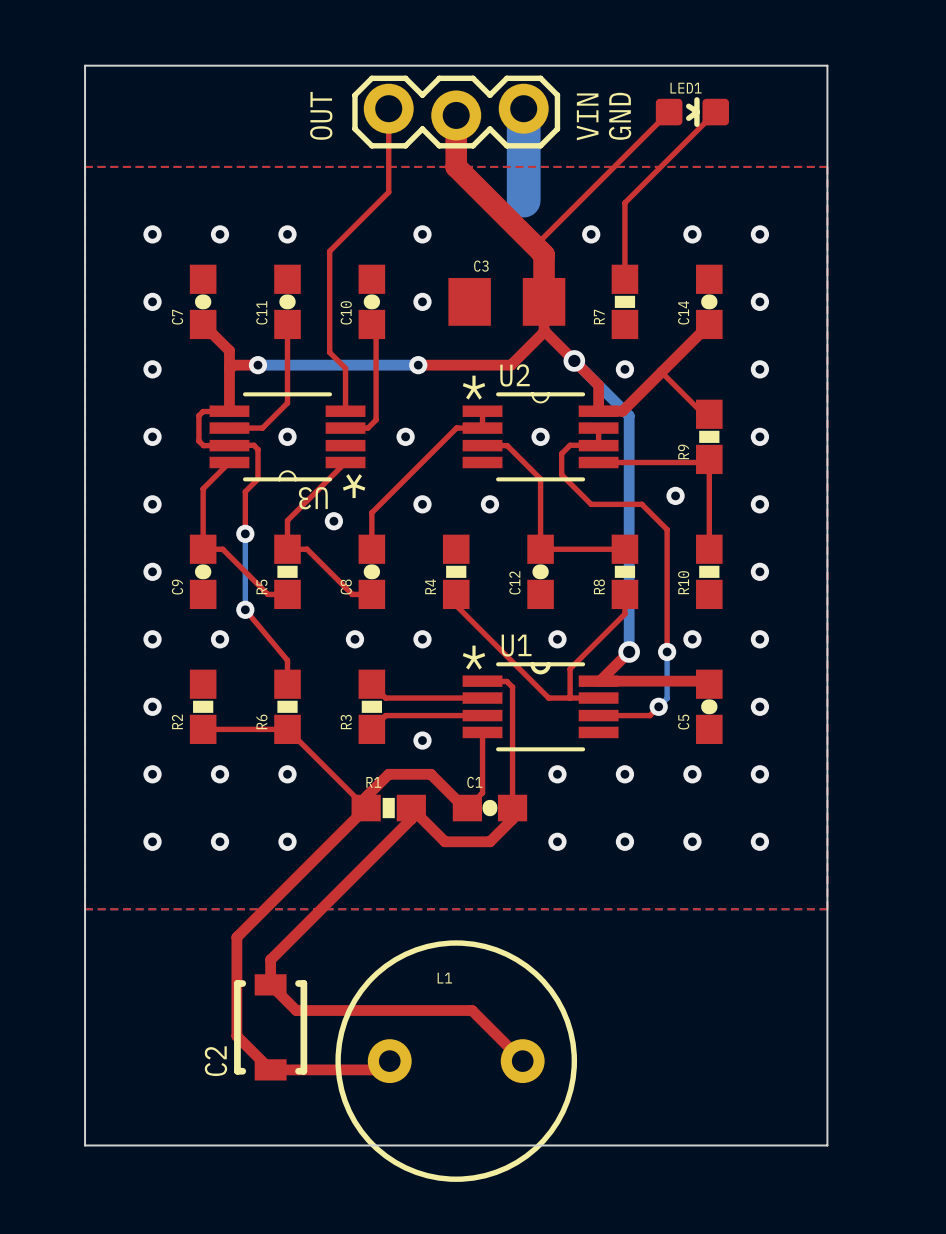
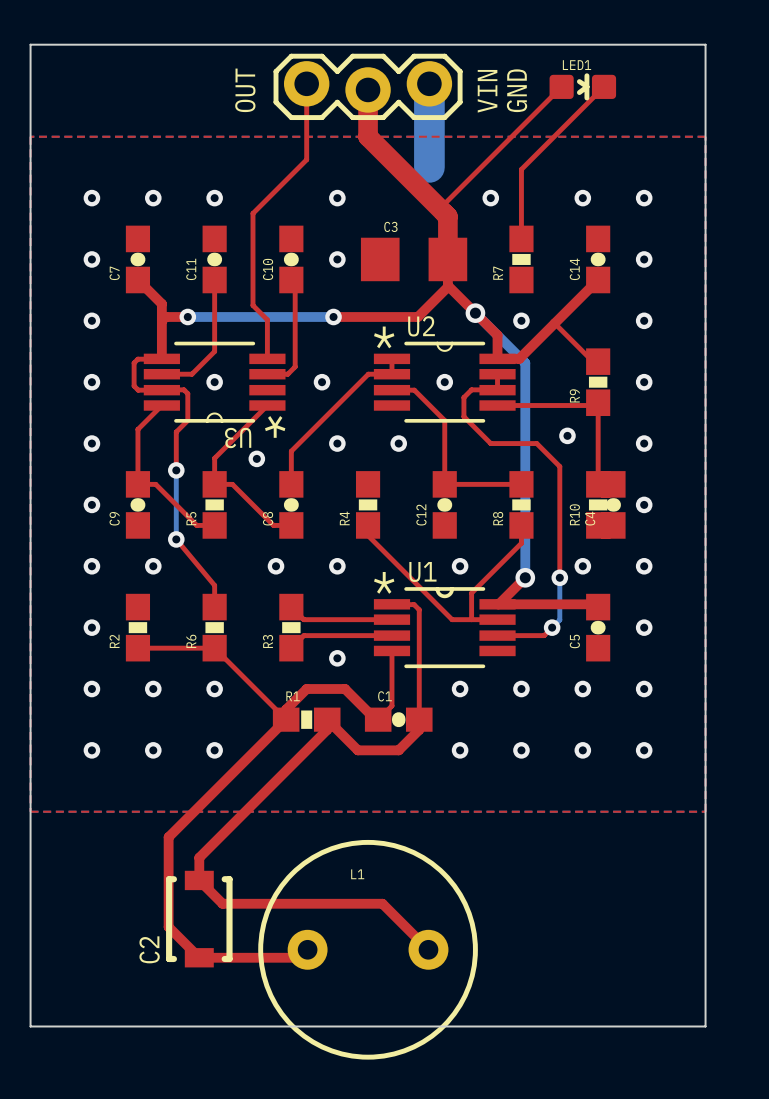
C4: none -> (613, 504)

